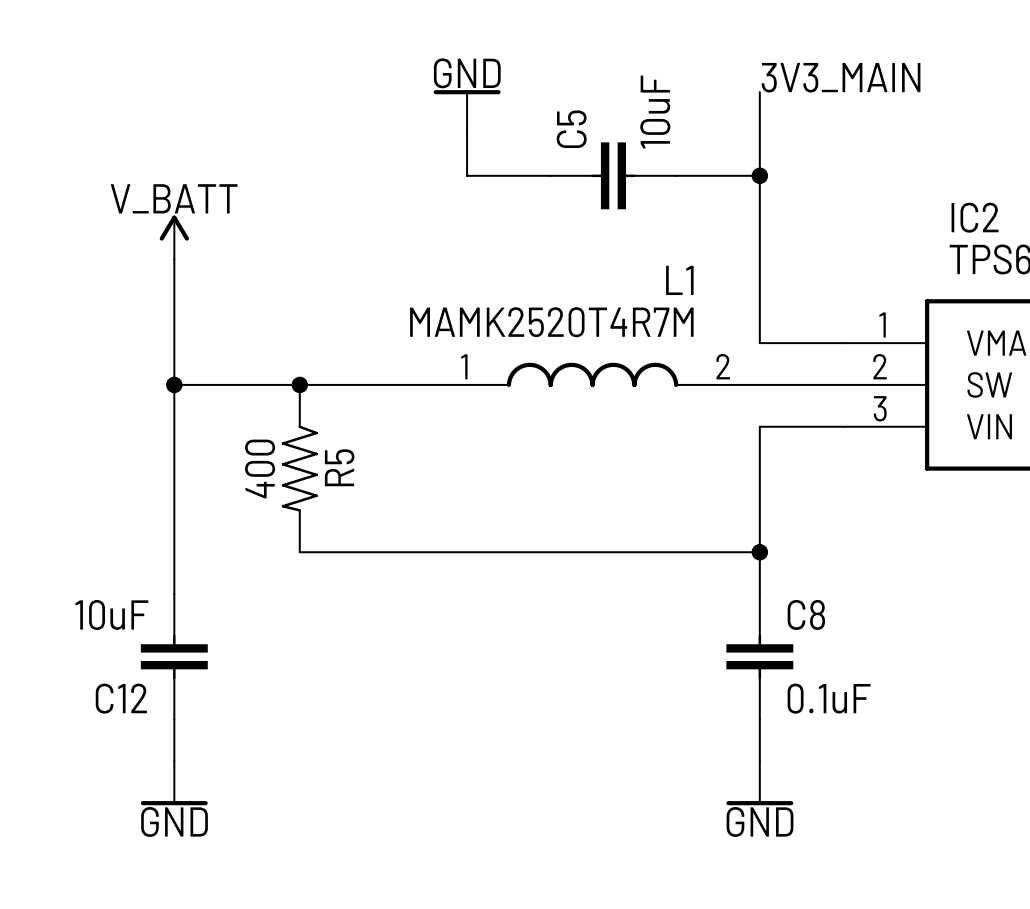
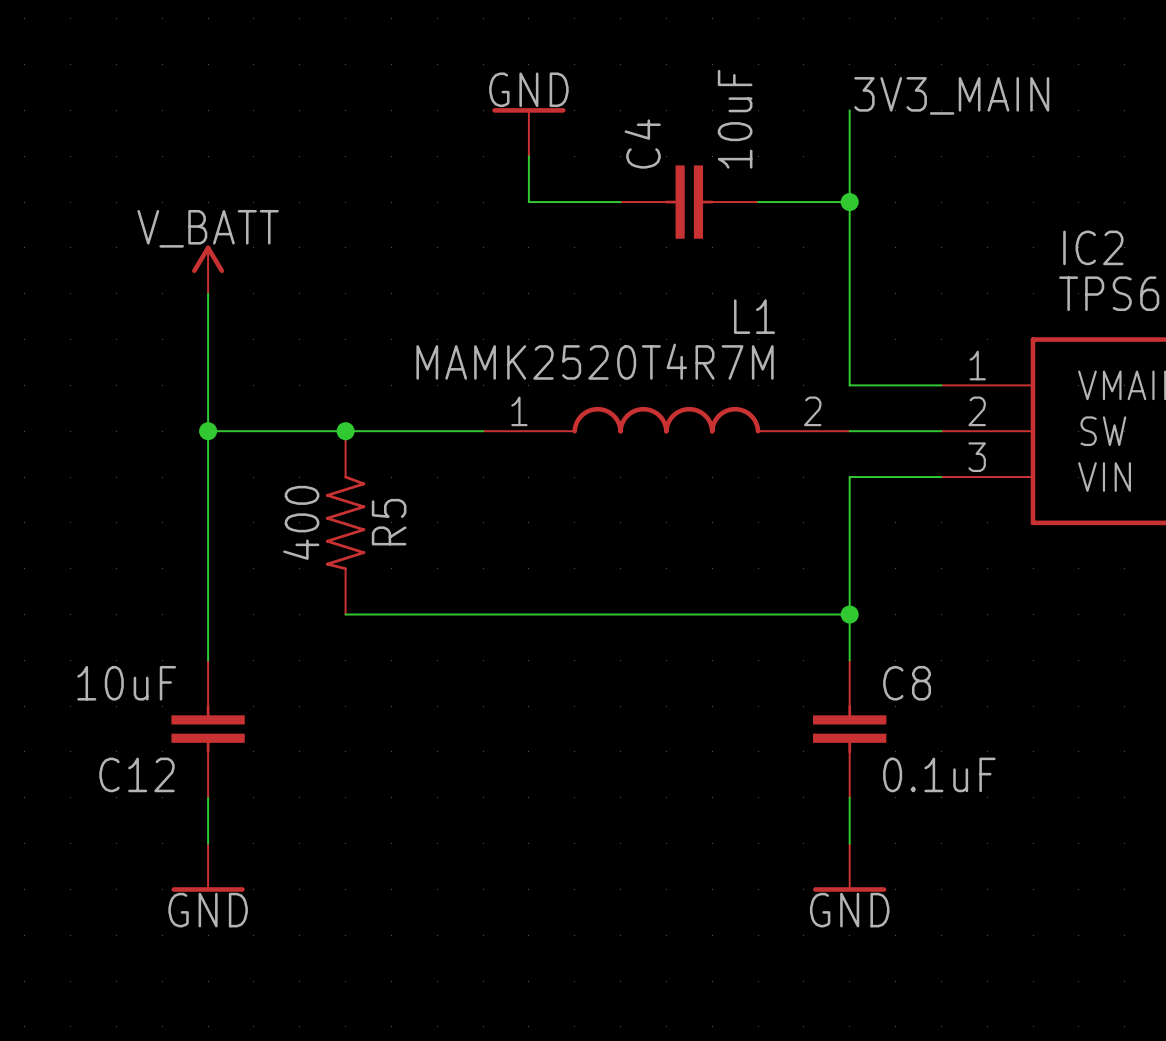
C5 name: C5 (571, 129) -> C4 (642, 144)

